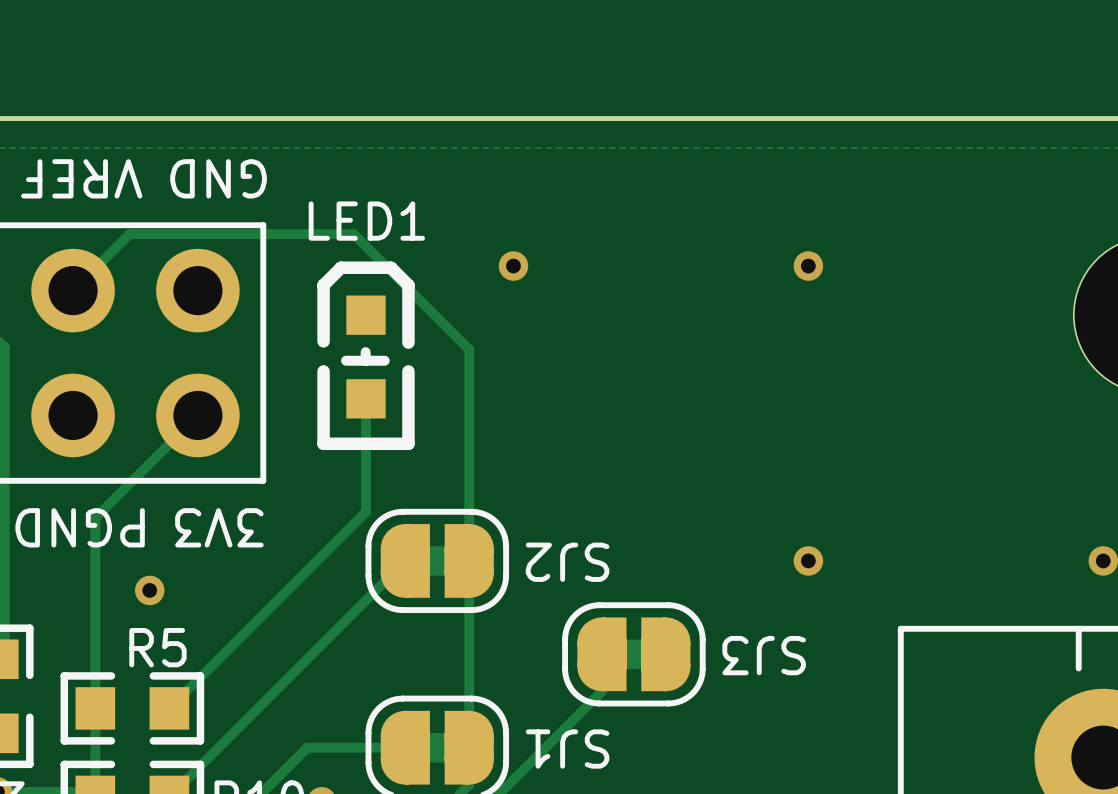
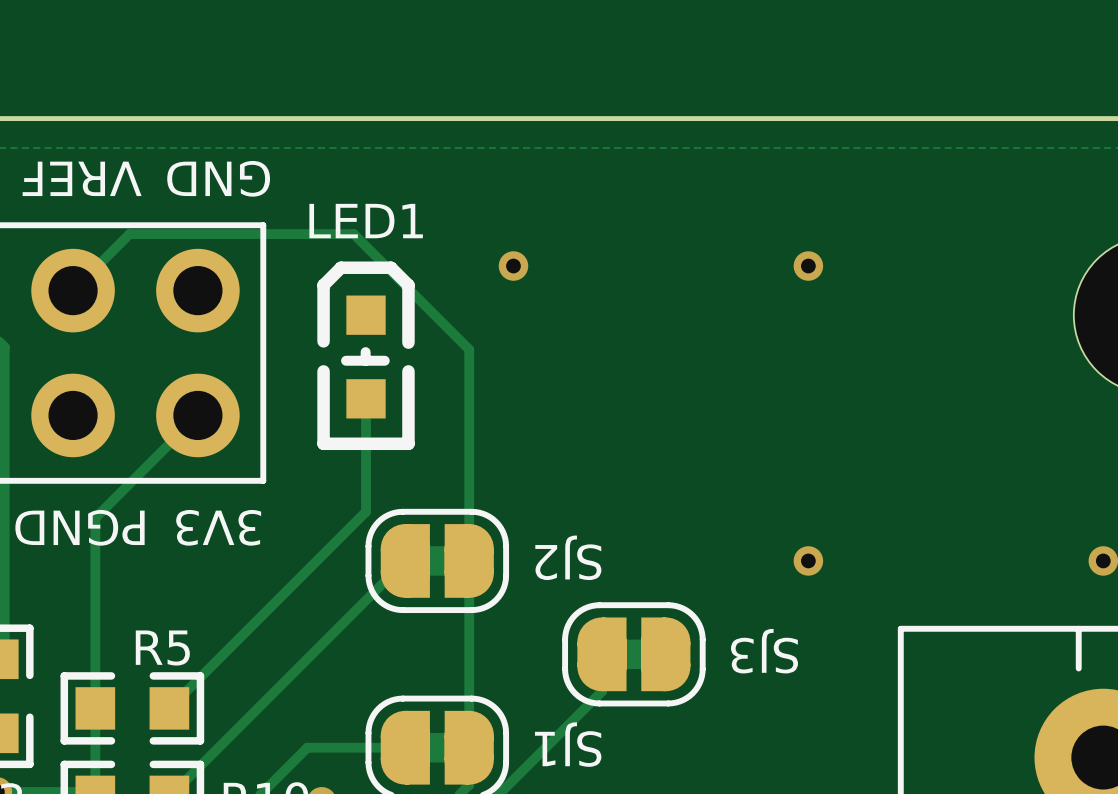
via: (149, 590) -> none

